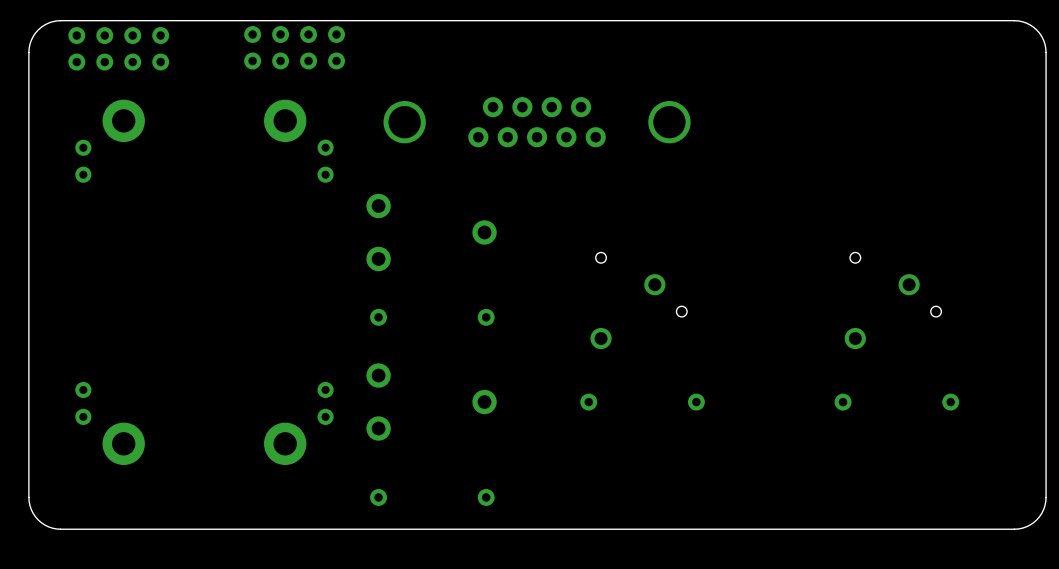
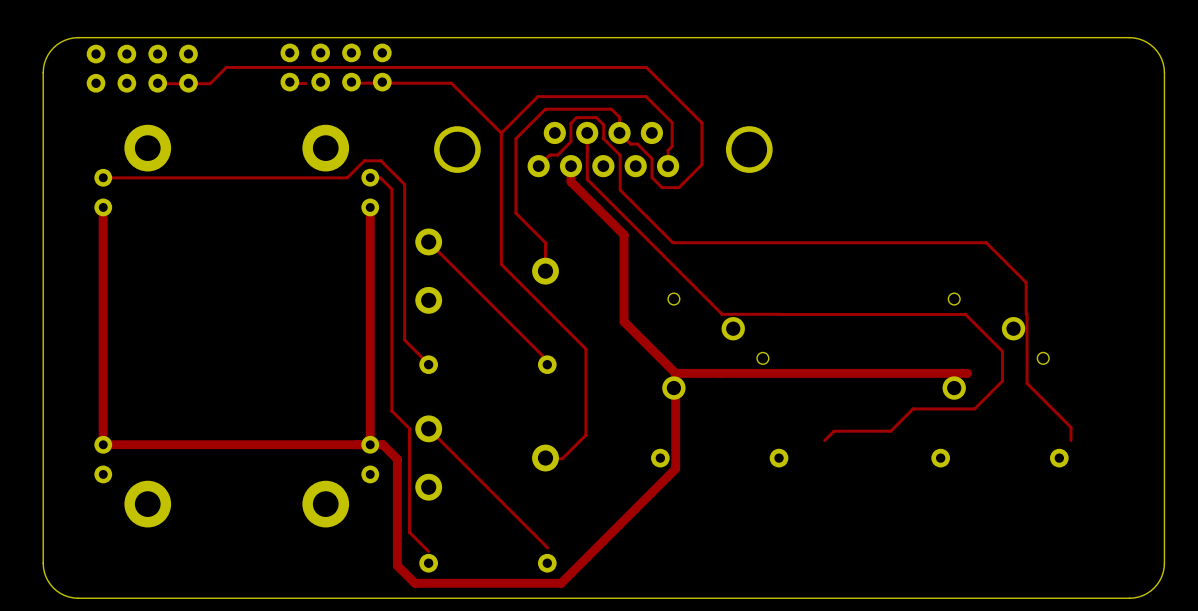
top track: none -> (150, 83) (210, 83) (226, 67) (646, 67) (701, 122) (701, 164) (678, 187) (662, 187) (651, 177) (651, 158) (637, 144) (630, 144) (619, 132) (619, 117) (611, 109) (545, 109) (515, 138) (515, 213) (545, 242) (545, 270)
top track: none -> (305, 83) (292, 83)
top track: none -> (355, 83) (451, 83) (501, 133)
top track: none -> (501, 133) (537, 96) (646, 96) (672, 122) (672, 146) (668, 150) (668, 166)
top track: none -> (501, 133) (501, 264) (585, 349) (585, 435) (562, 458) (546, 458)
top track: none -> (587, 132) (587, 179) (722, 314) (780, 314)
top track: none -> (538, 166) (549, 155) (557, 155) (570, 141) (570, 123) (576, 117) (596, 117) (603, 124) (603, 138) (620, 155) (620, 190) (672, 242) (986, 242) (1026, 282) (1026, 314)
top track: none -> (571, 166) (571, 181) (624, 234) (624, 321) (675, 373)
top track: none -> (103, 177) (347, 177) (364, 160) (380, 160) (404, 184) (404, 340) (429, 364)
top track: none -> (370, 178) (380, 178) (391, 189) (391, 410) (409, 428) (409, 532) (428, 551)
top track: none -> (103, 207) (102, 444)
top track: none -> (370, 208) (370, 444)
top track: none -> (428, 241) (547, 361) (547, 364)
top track: none -> (779, 314) (965, 314) (1002, 351) (1002, 381) (974, 408) (913, 408) (890, 431) (834, 431) (824, 440)
top track: none -> (1027, 314) (1027, 383) (1071, 427) (1071, 440)
top track: none -> (675, 373) (675, 468) (561, 583) (414, 583) (397, 565) (397, 459) (382, 444) (357, 444)
top track: none -> (967, 373) (675, 373)
top track: none -> (428, 428) (547, 547)
top track: none -> (357, 444) (102, 444)

